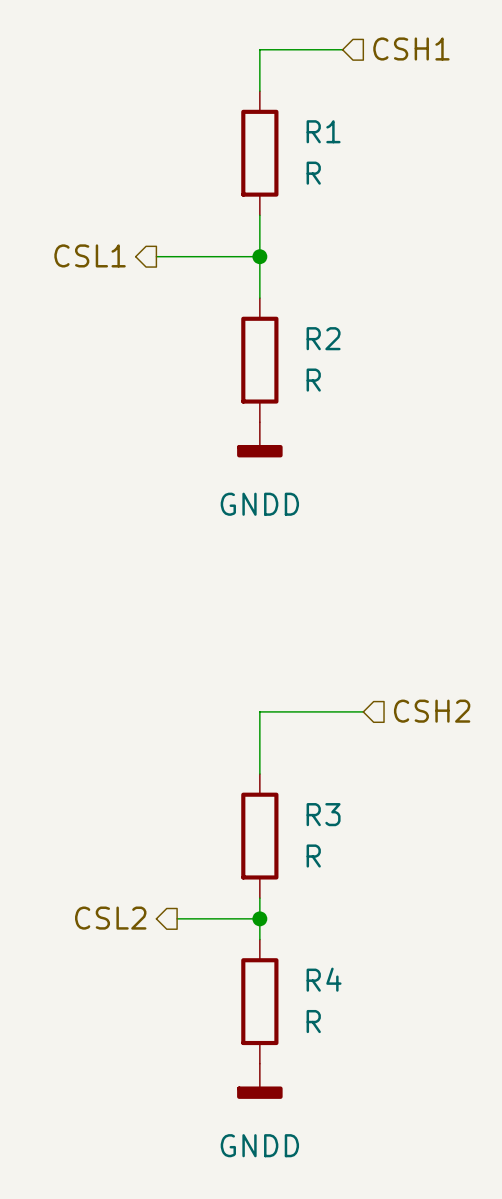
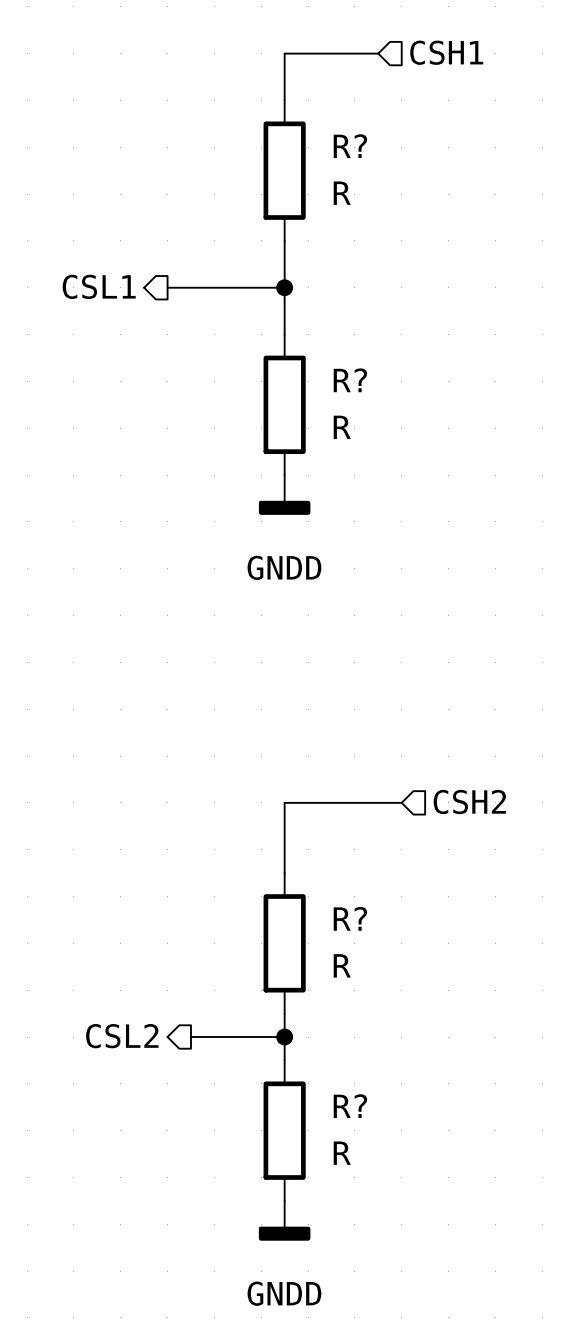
R1 name: R1 (323, 131) -> R? (350, 146)
R2 name: R2 (323, 338) -> R? (350, 380)
R3 name: R3 (323, 814) -> R? (350, 918)
R4 name: R4 (324, 979) -> R? (350, 1106)

